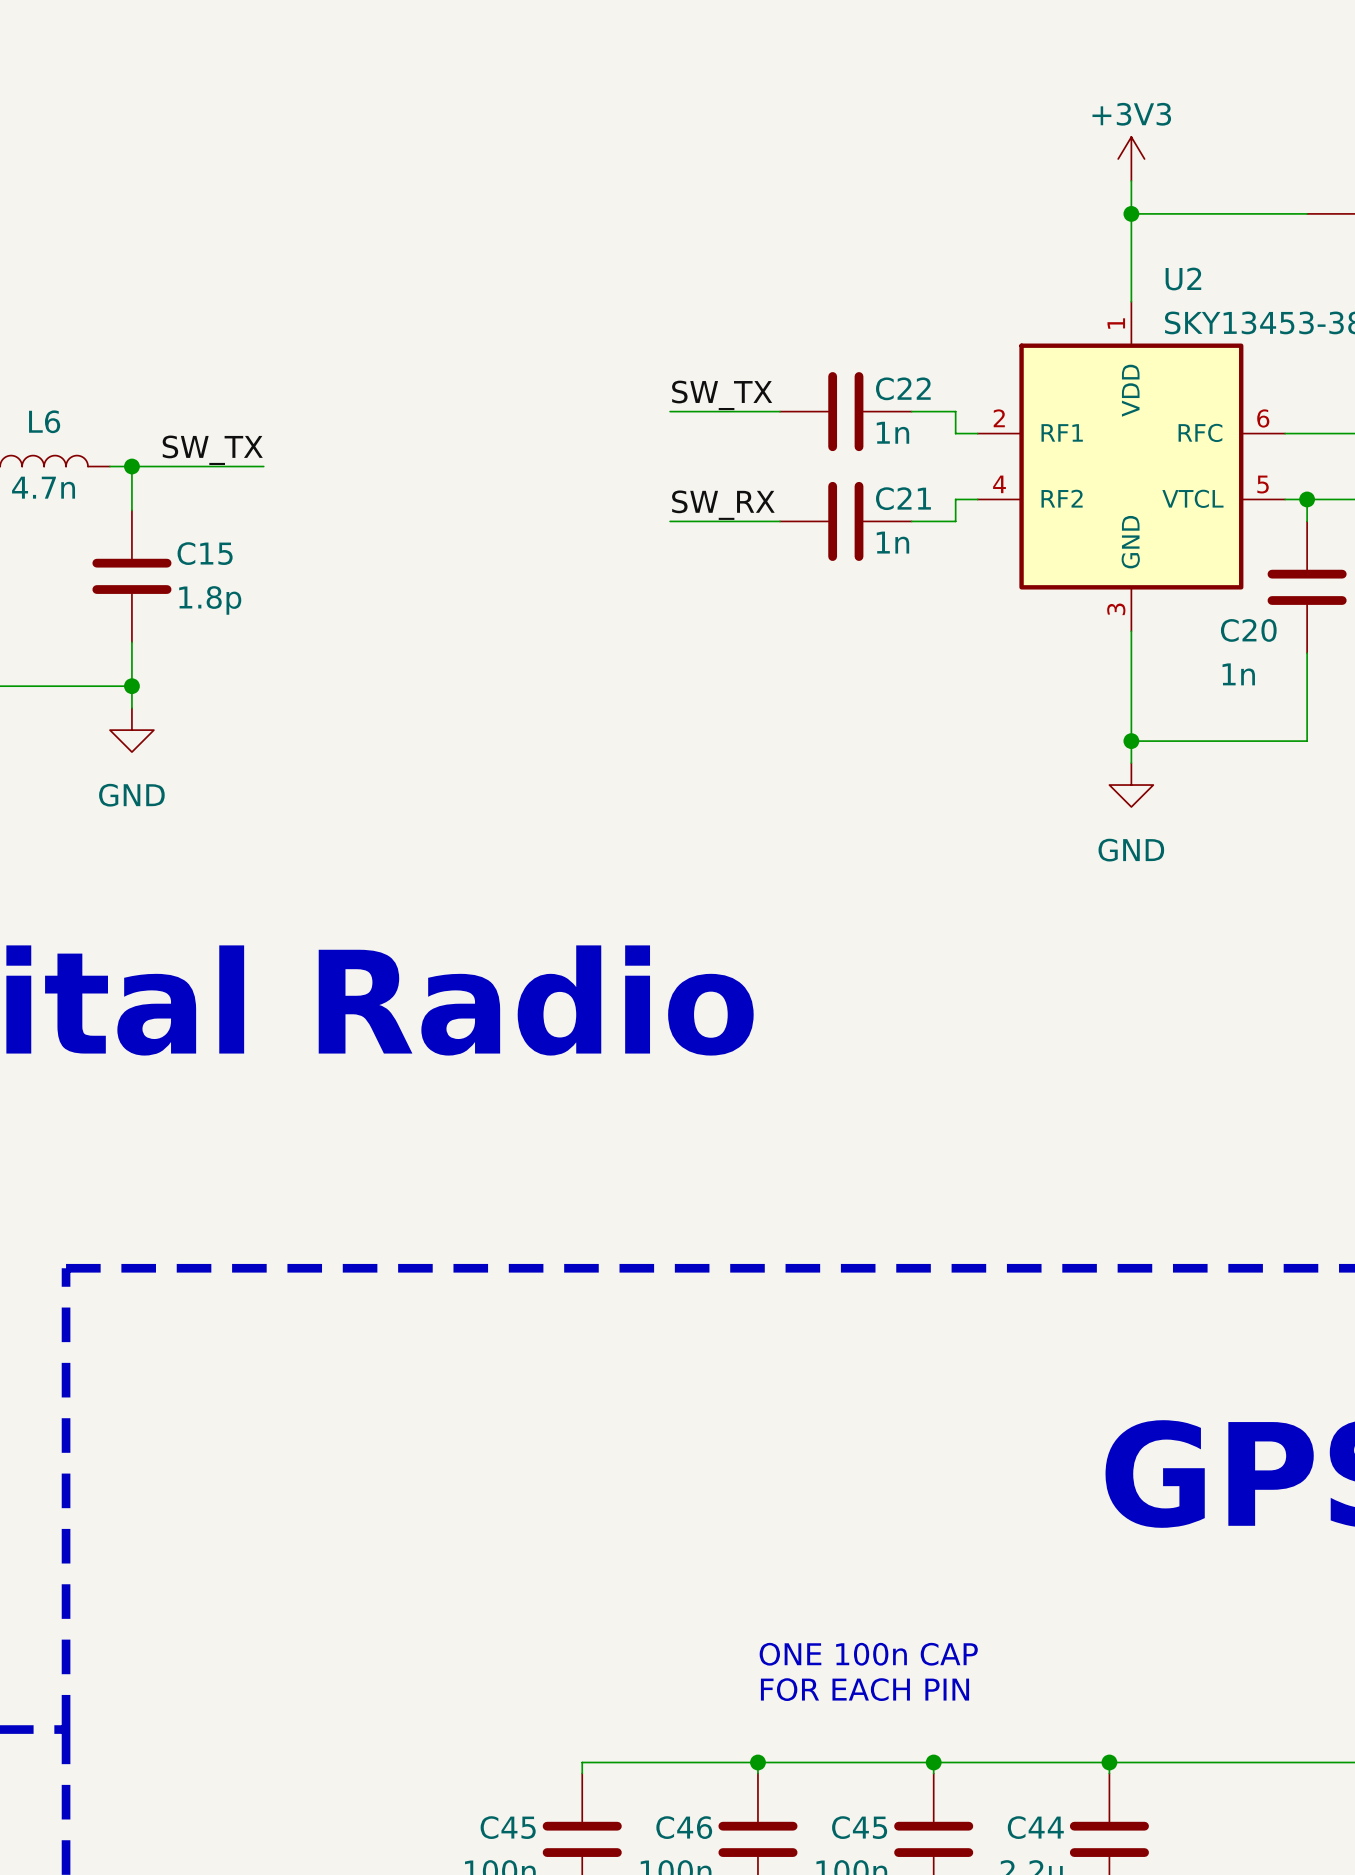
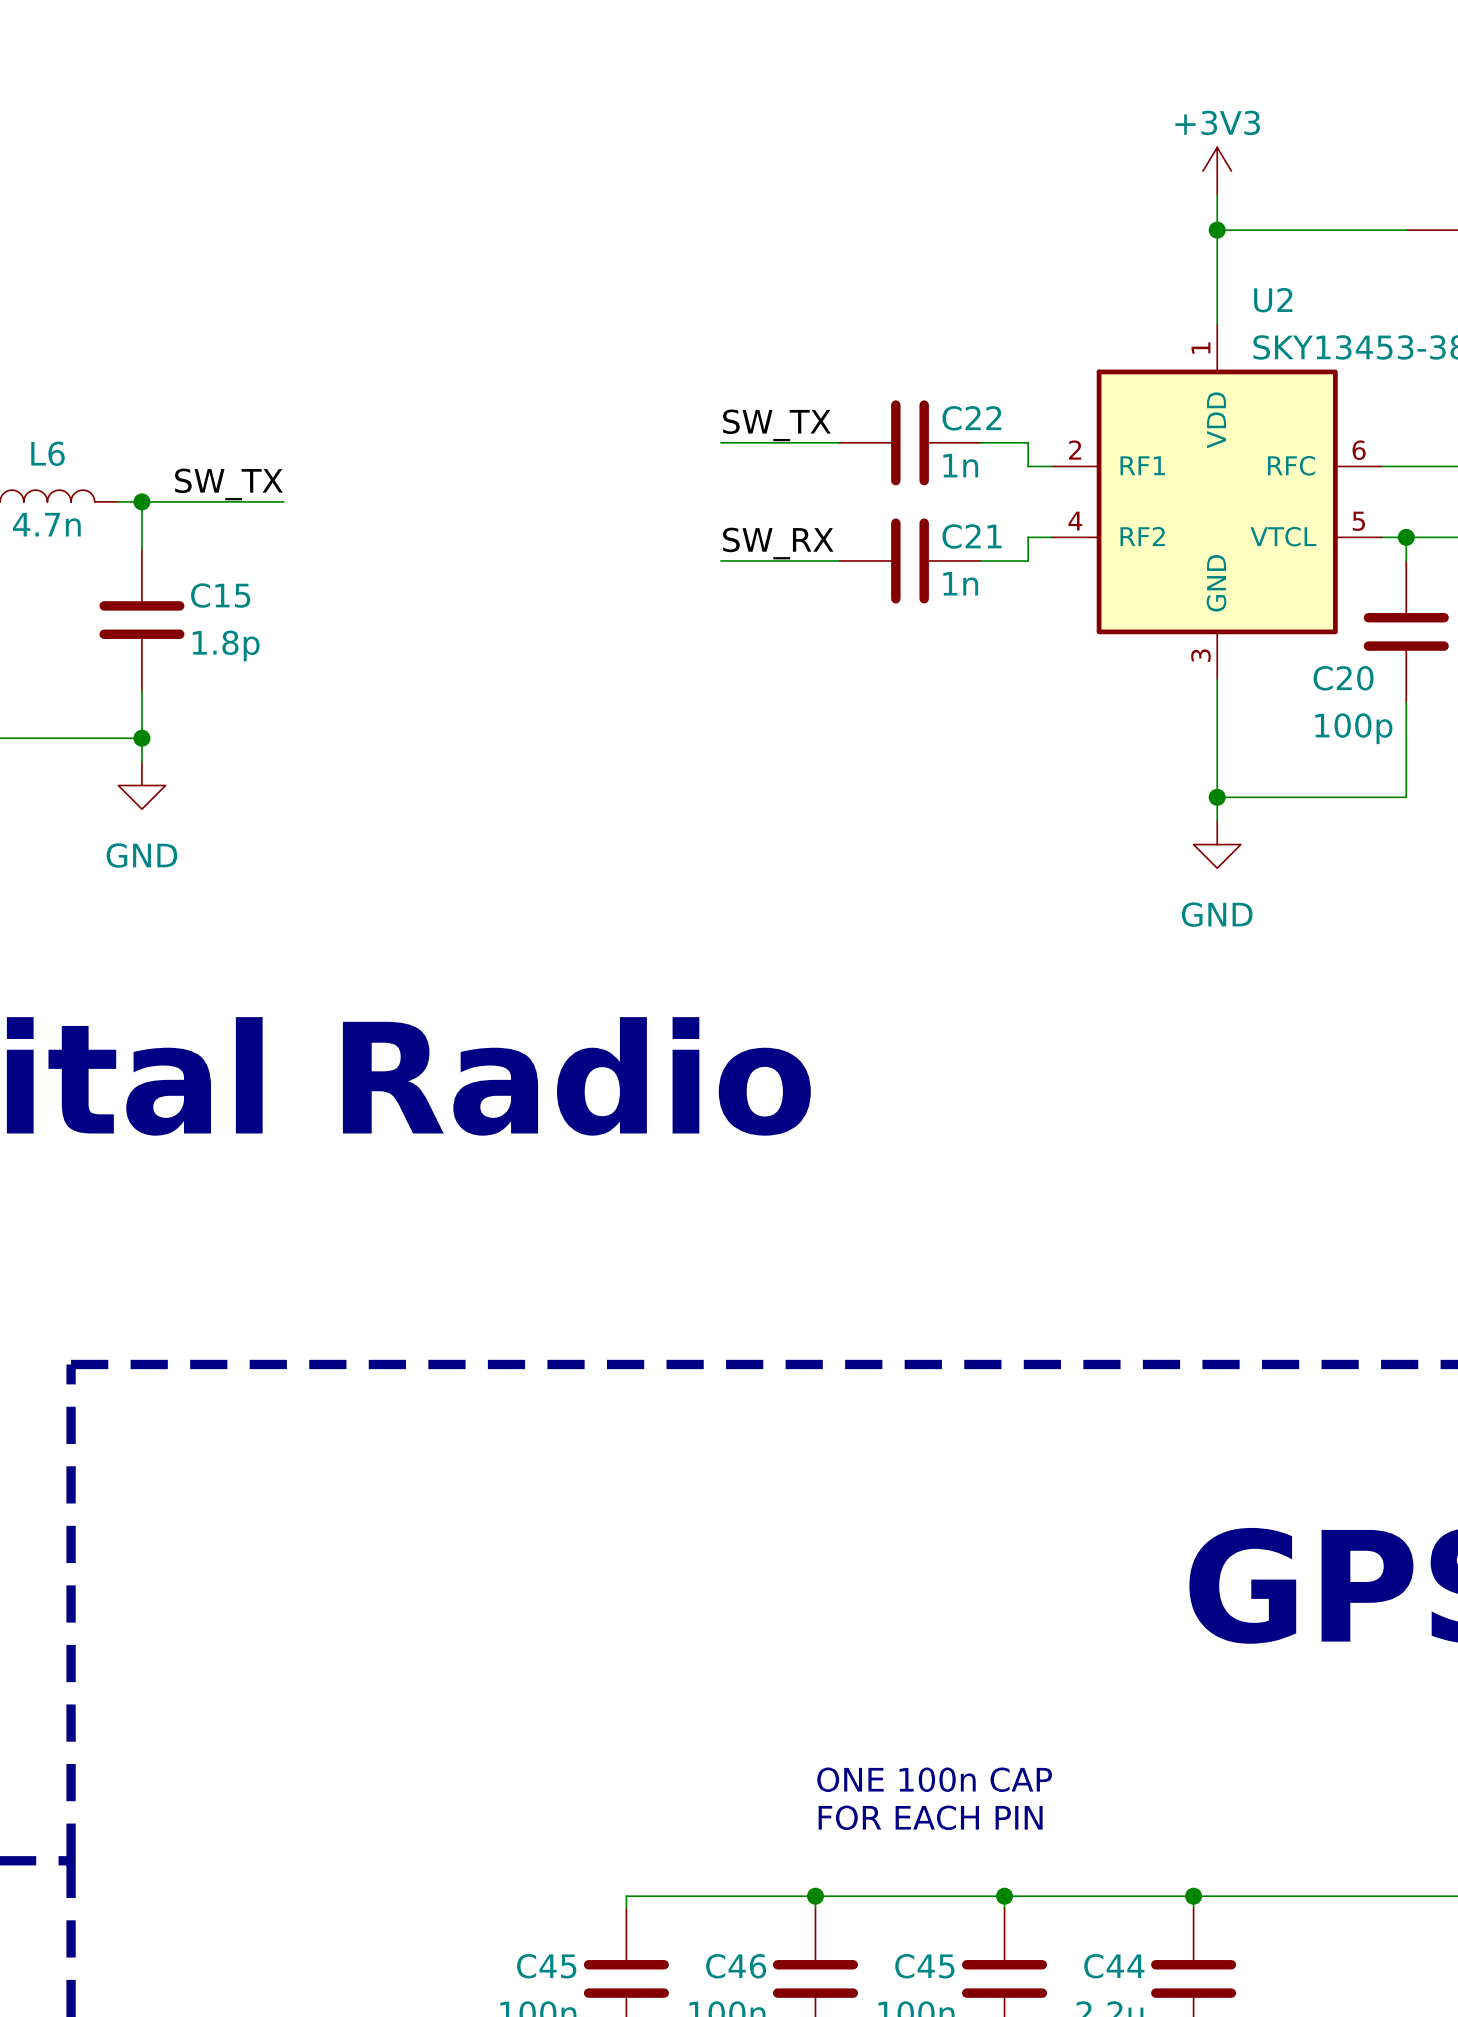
C20 value: 1n (1238, 674) -> 100p (1353, 728)

